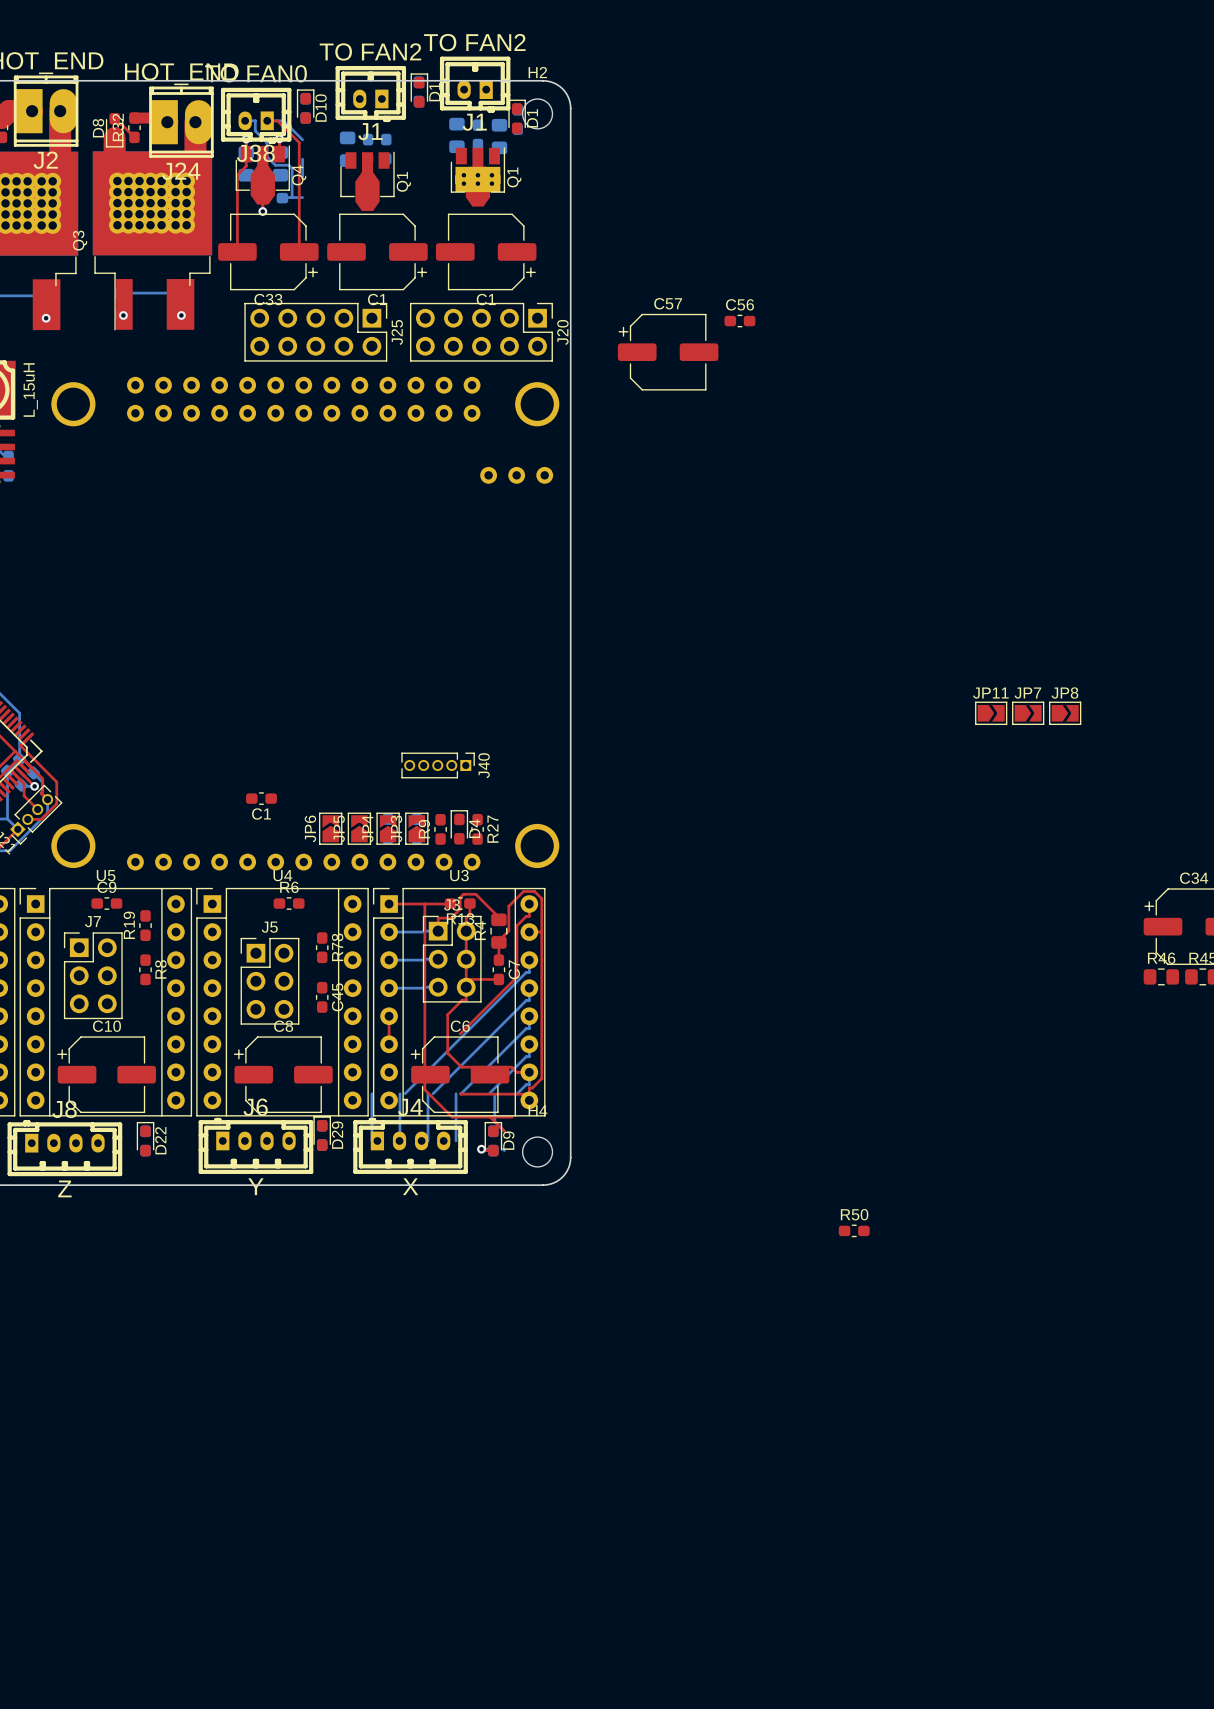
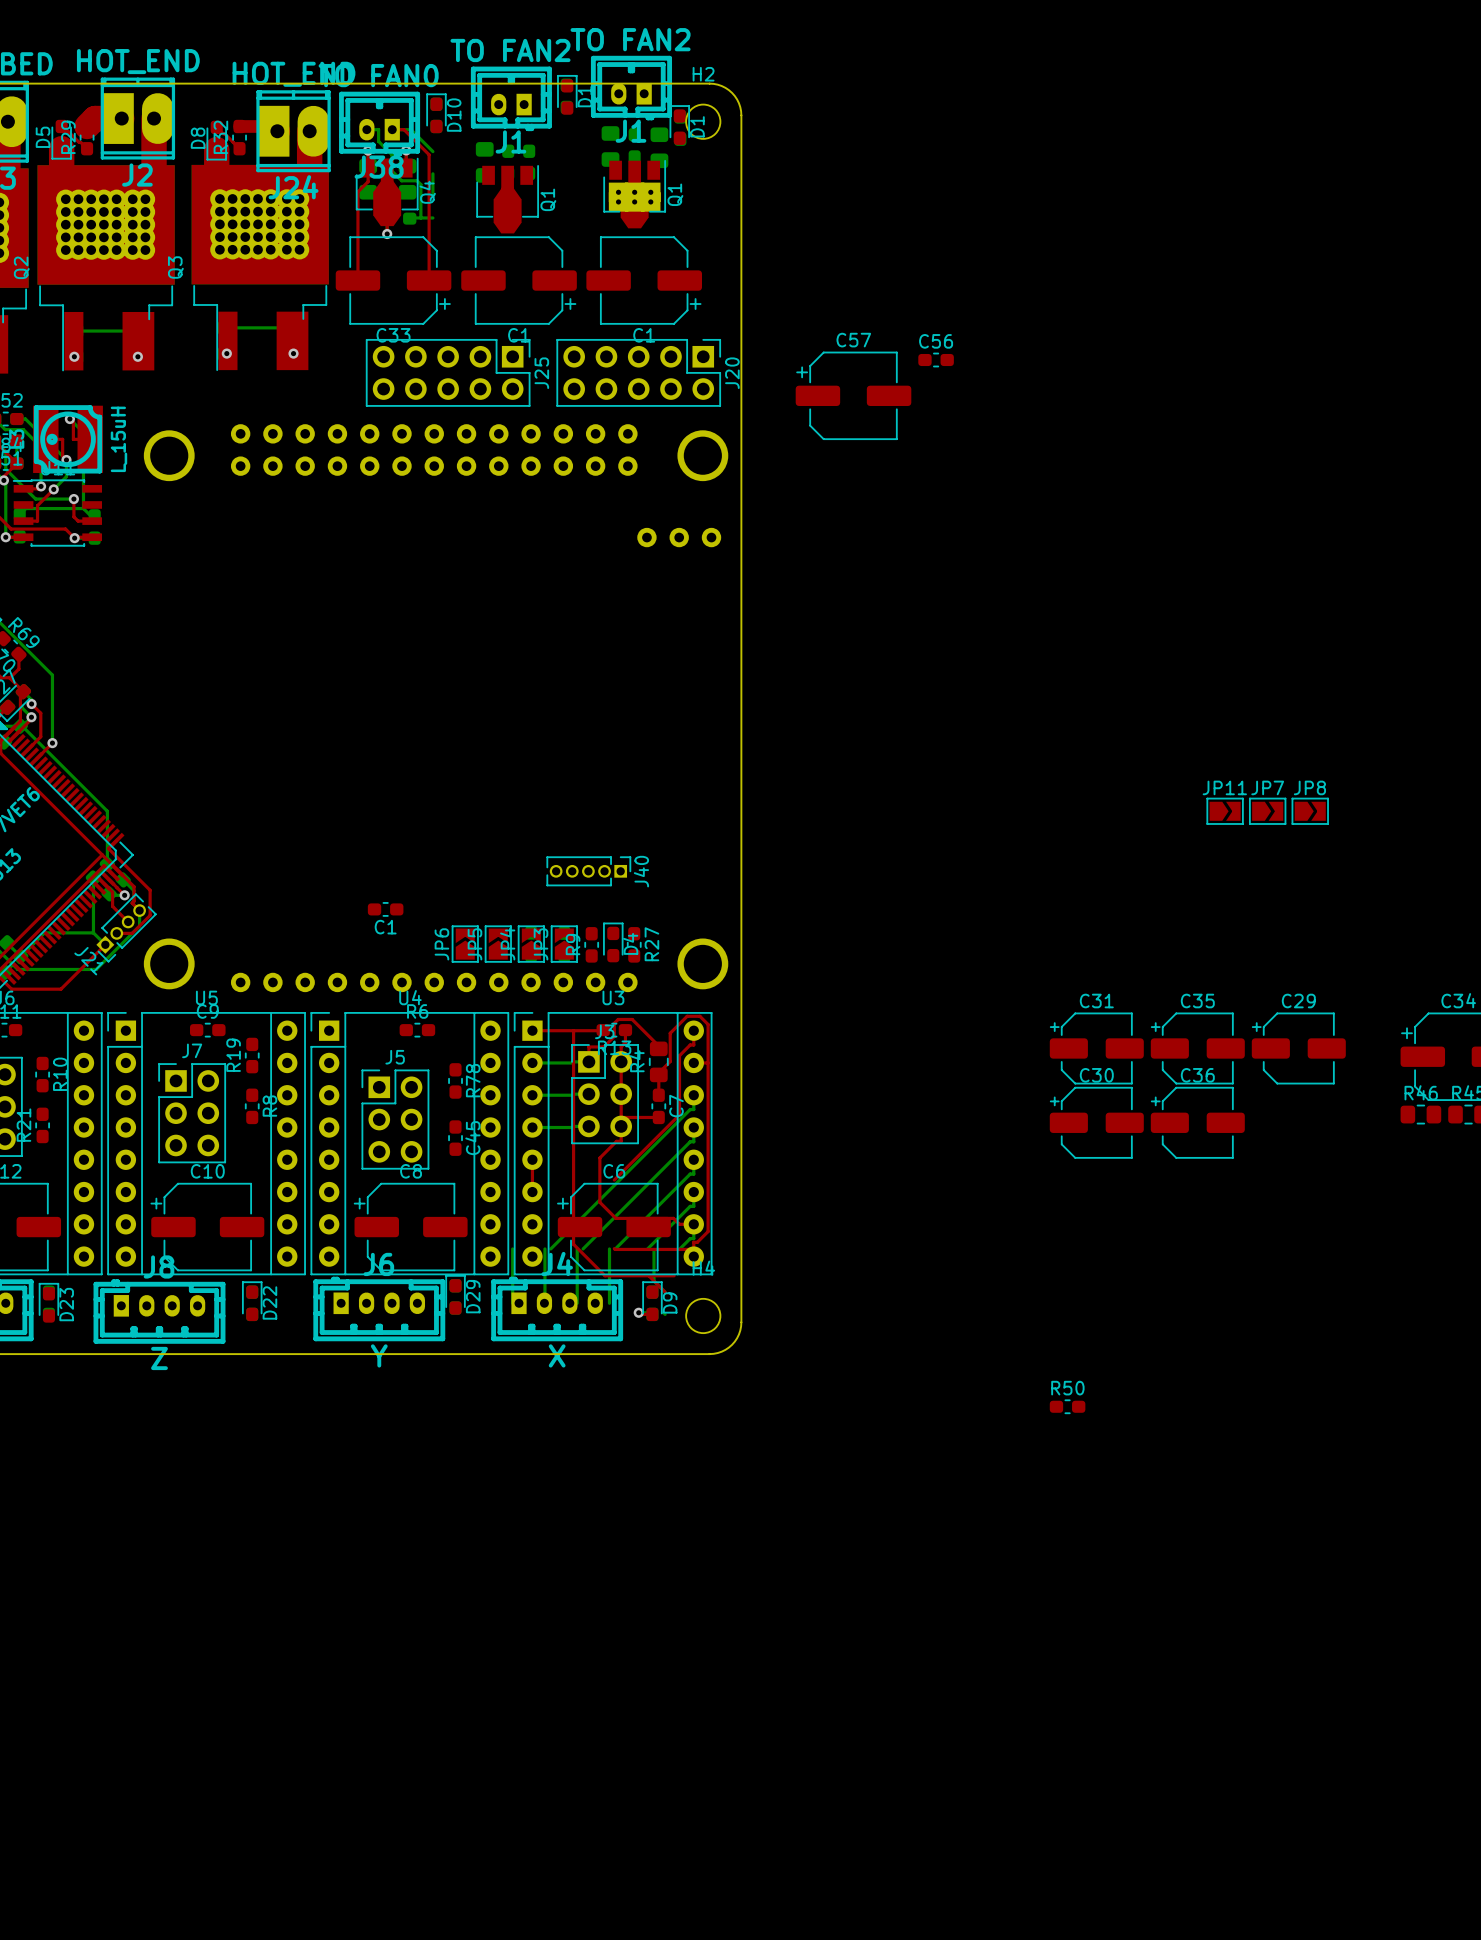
C31: none -> (1096, 1048)
C35: none -> (1197, 1048)
C29: none -> (1298, 1048)
C30: none -> (1096, 1122)
C36: none -> (1197, 1122)

